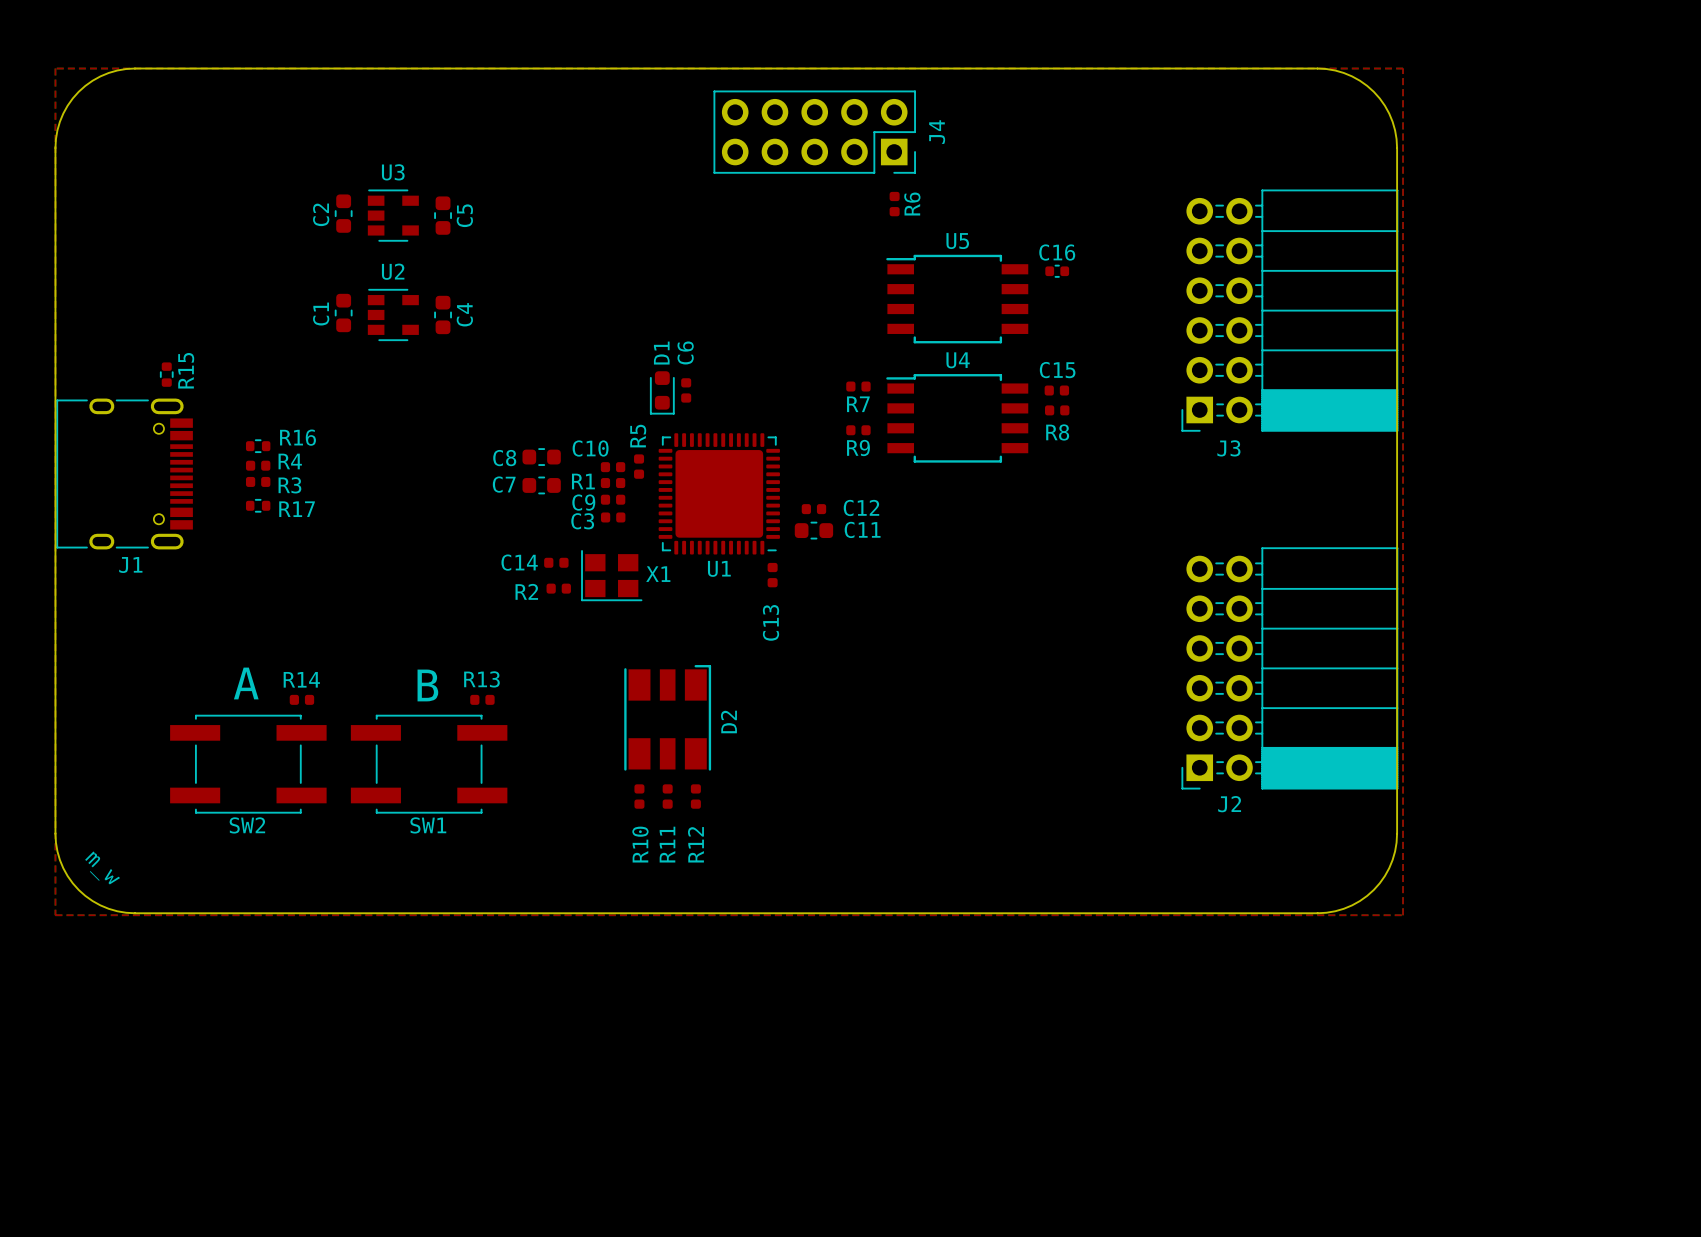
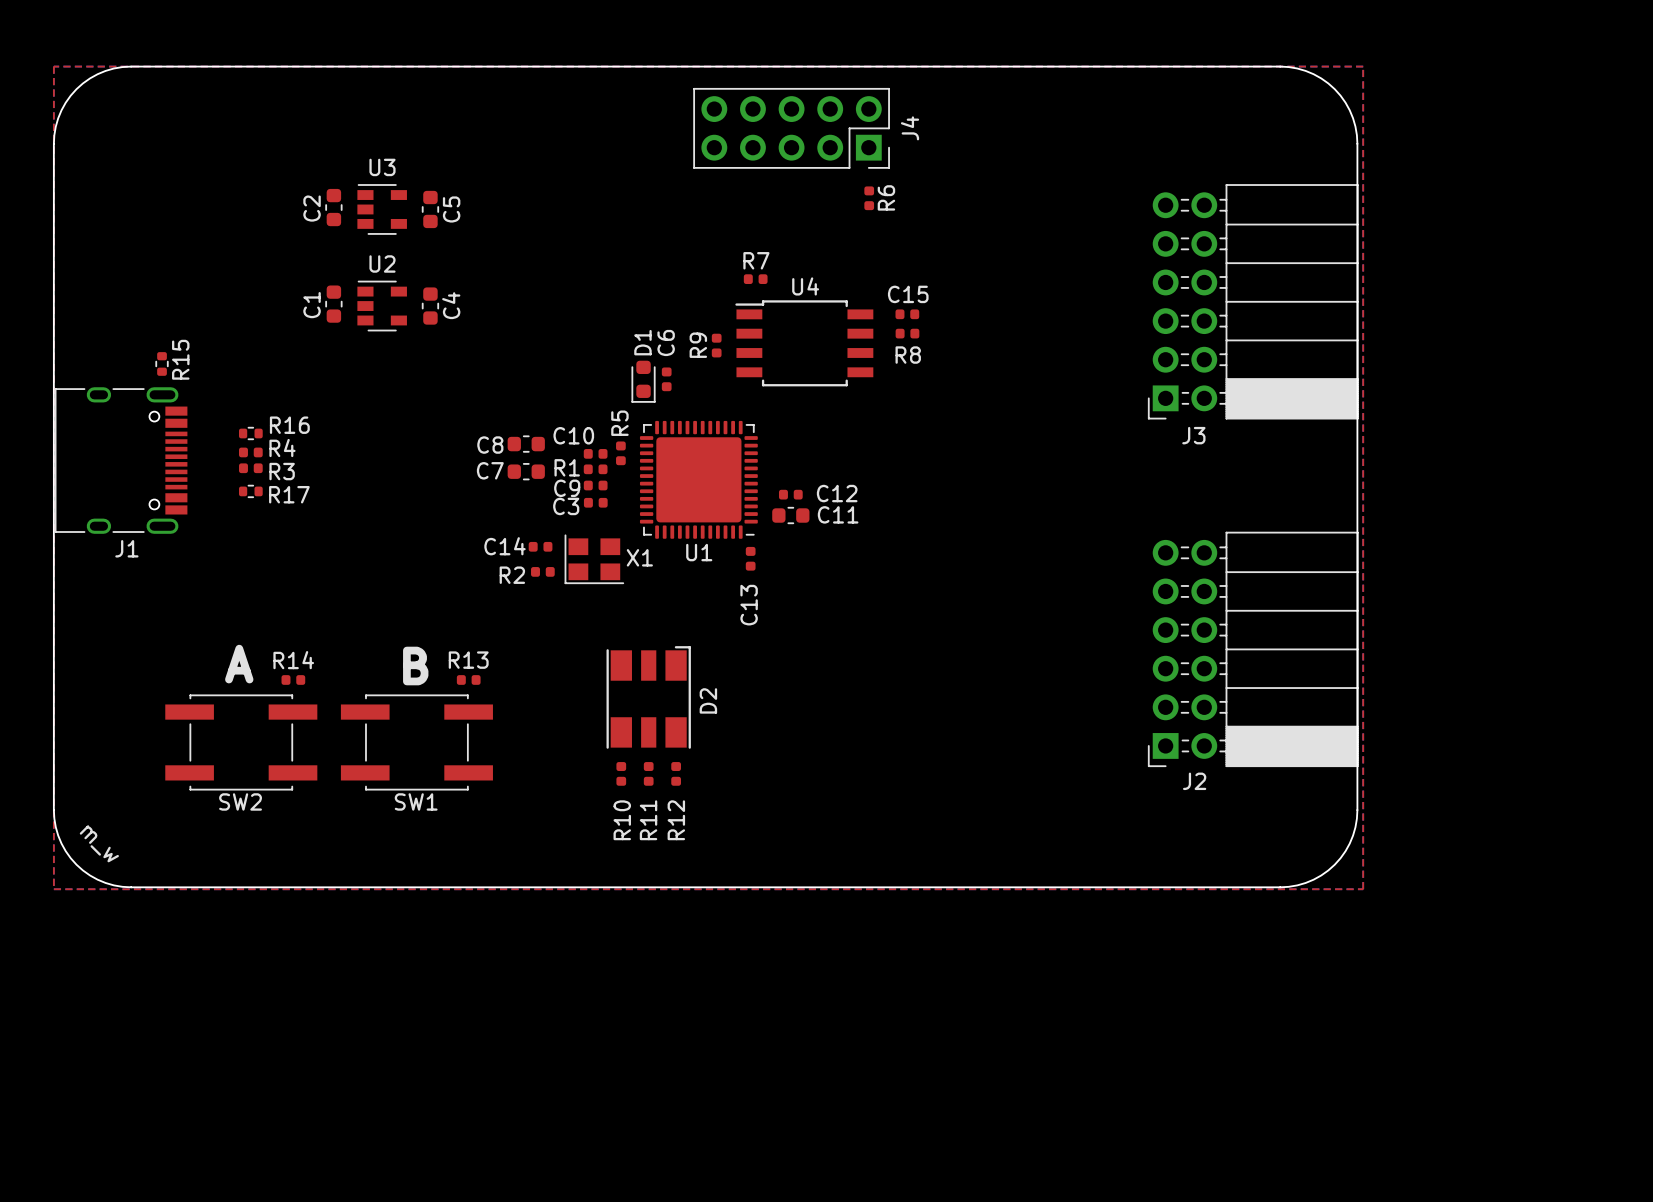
C16: (1057, 271) -> none
U5: (957, 299) -> none
R7 position: (858, 386) -> (755, 279)
C15 position: (1056, 390) -> (907, 314)
R7 name position: R7 (858, 404) -> R7 (756, 260)
R8 position: (1057, 410) -> (907, 333)
U4 position: (957, 418) -> (804, 343)
R9 rotation: 0° (858, 430) -> 90° clockwise (716, 345)
R9 position: (858, 430) -> (716, 345)

